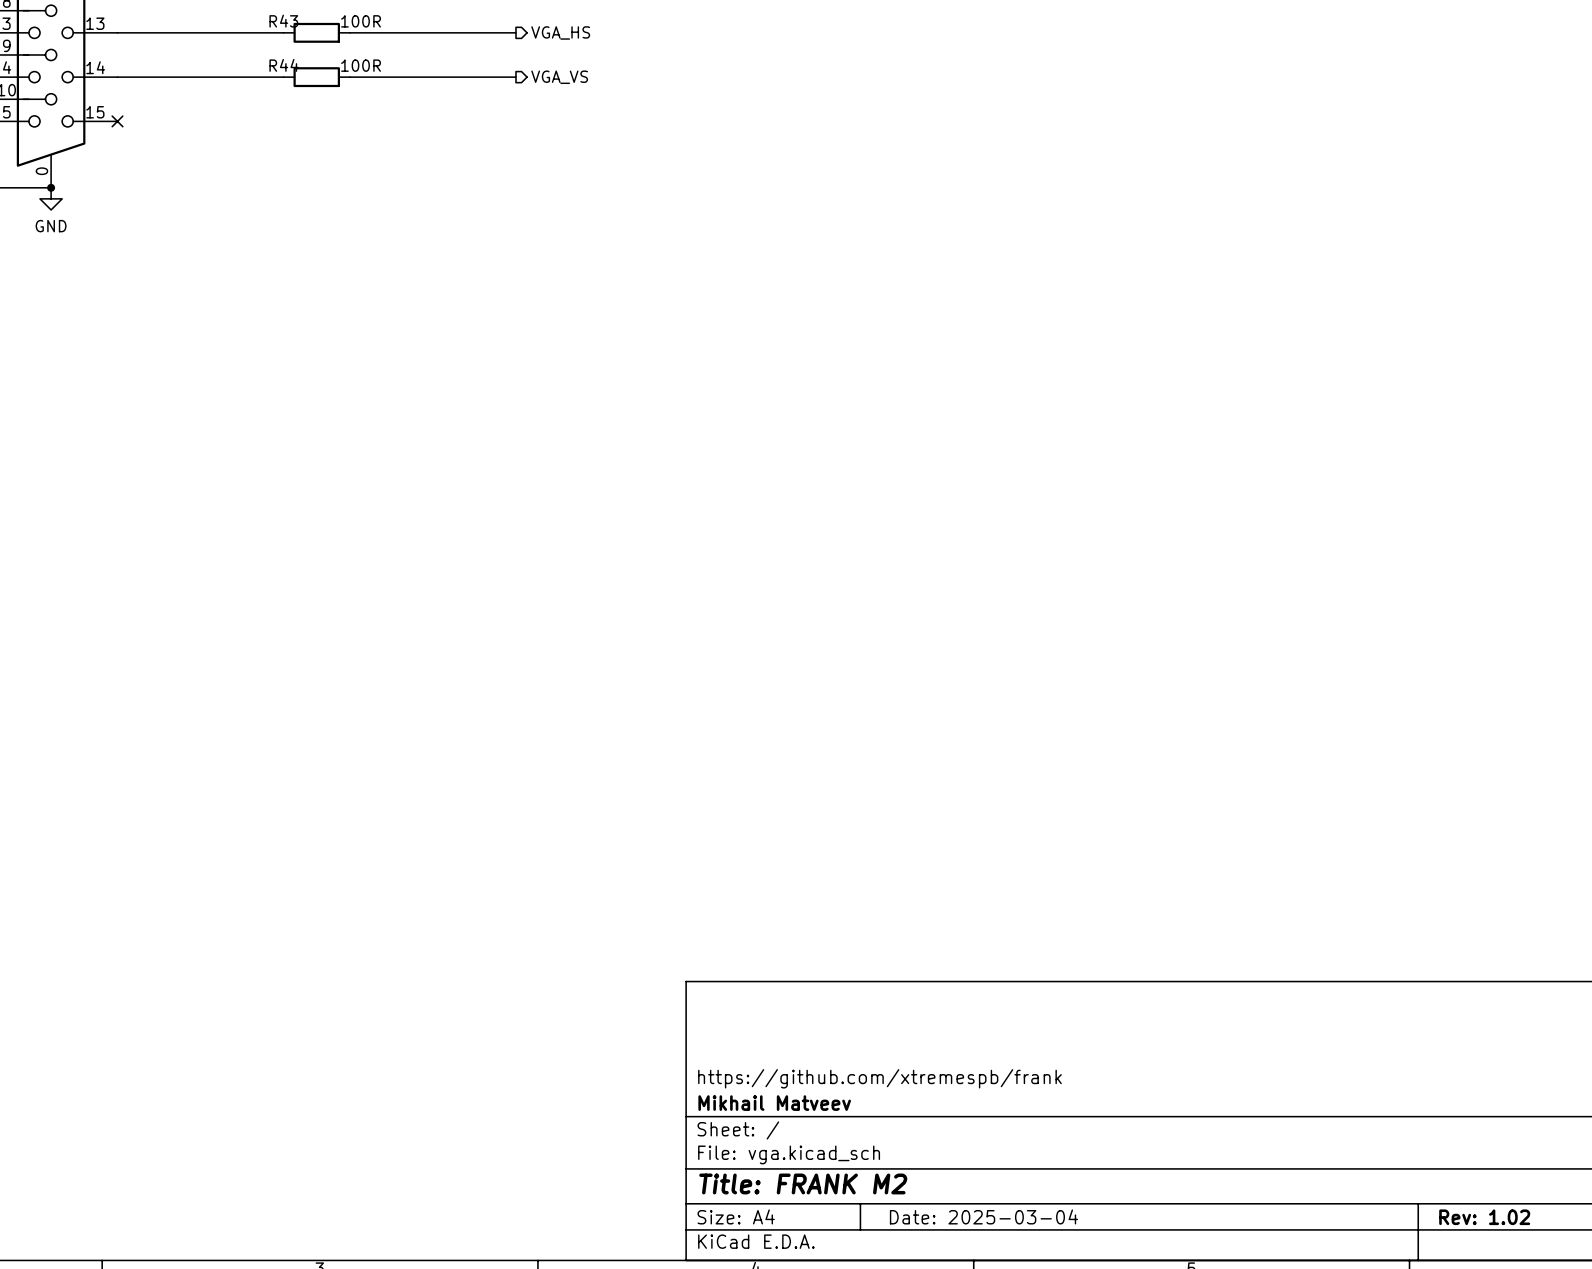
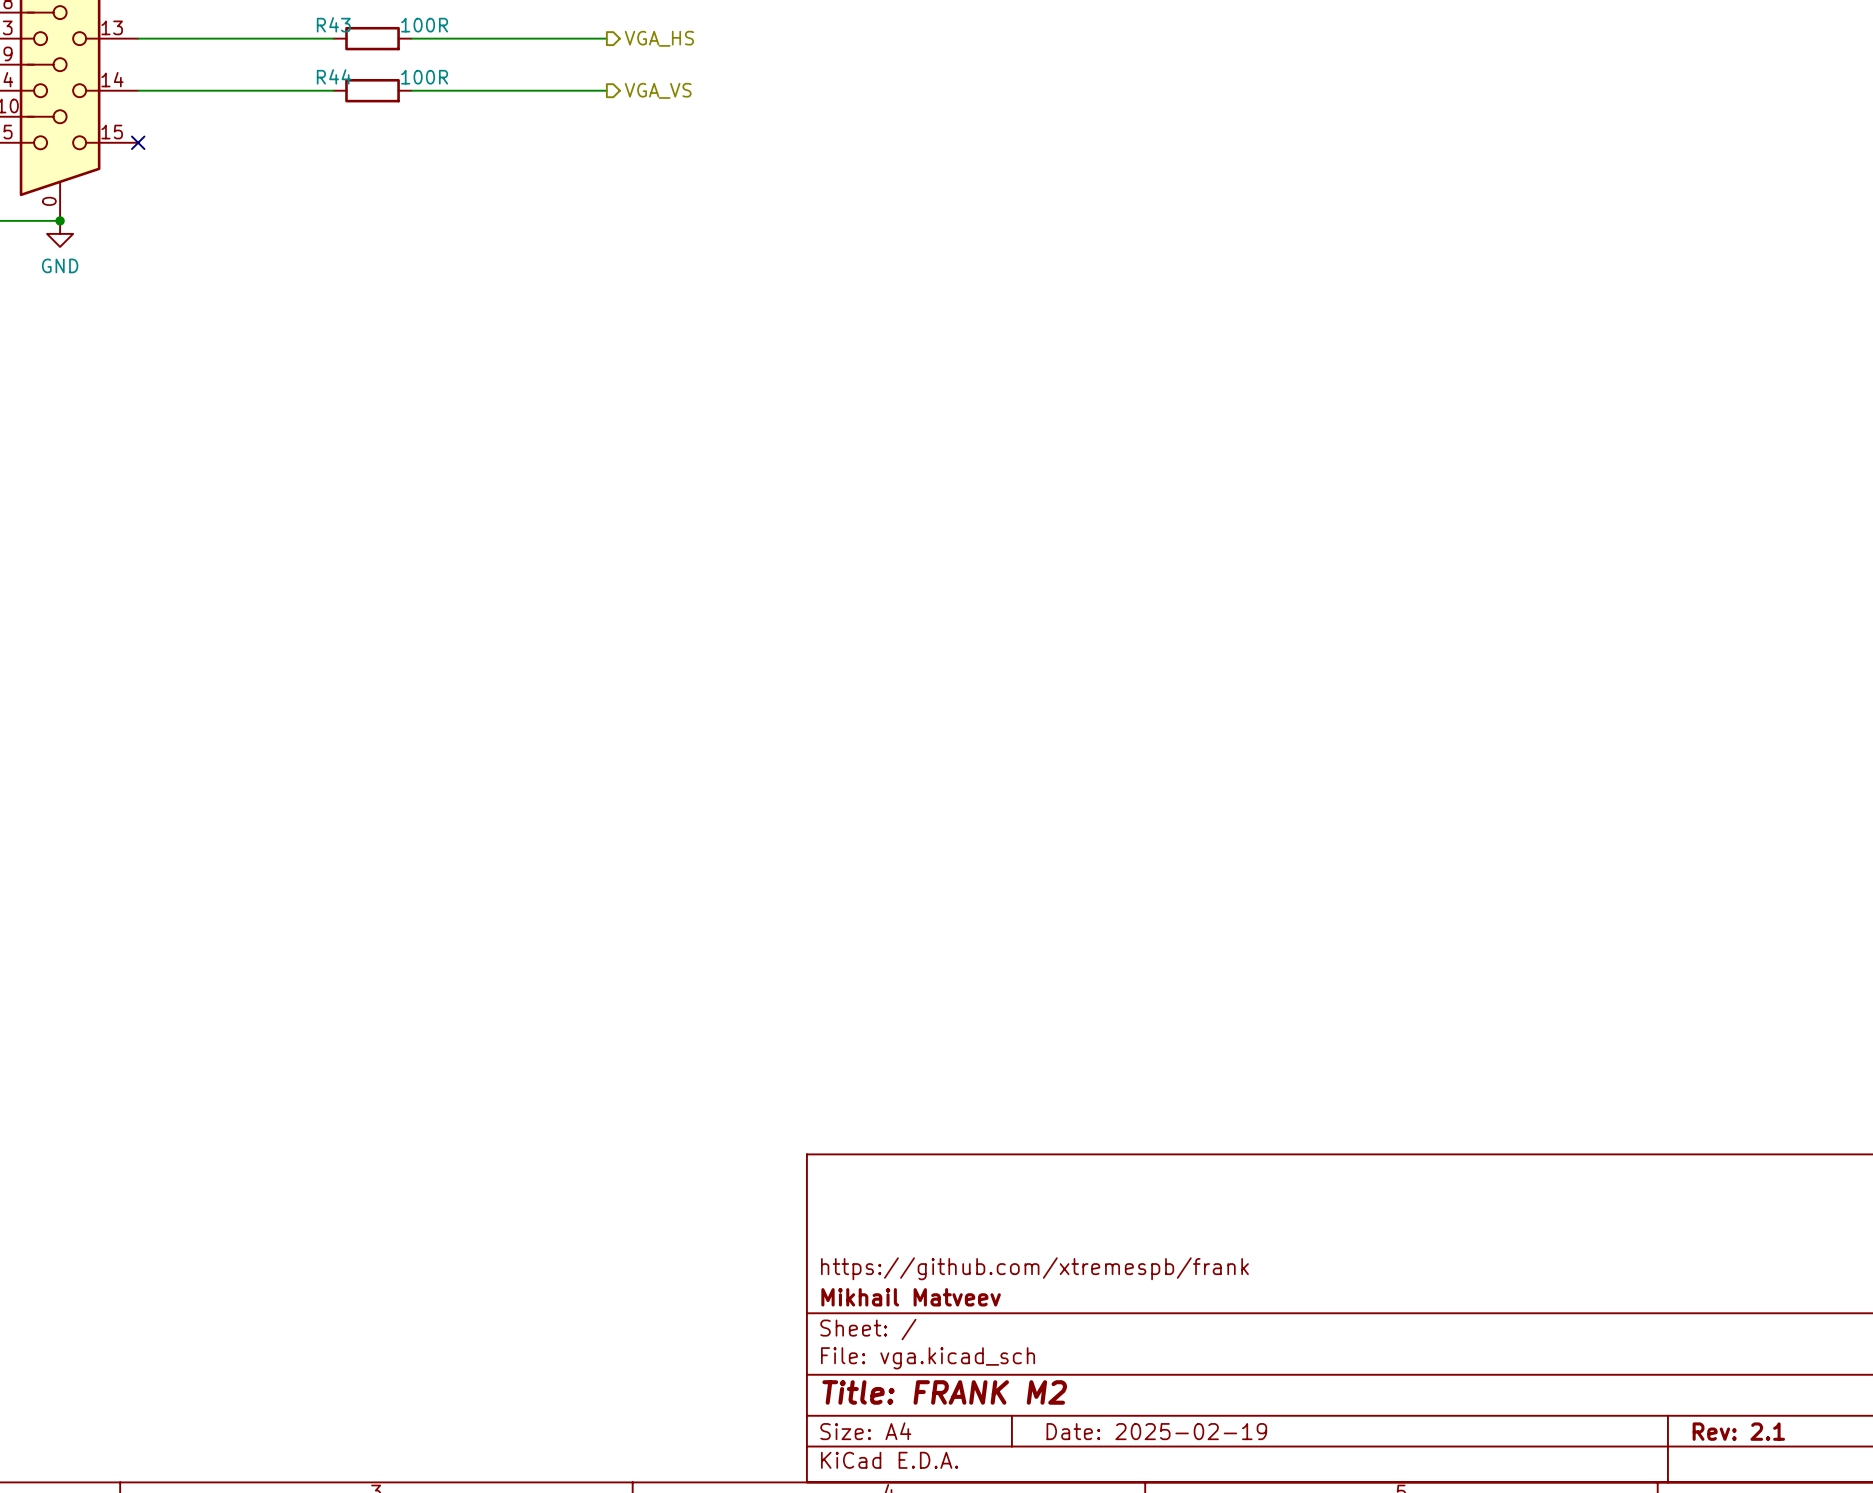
title block: Date: 2025-03-04 (983, 1216) -> Date: 2025-02-19 (1156, 1431)
title block: Rev: 1.02 (1484, 1217) -> Rev: 2.1 (1738, 1431)

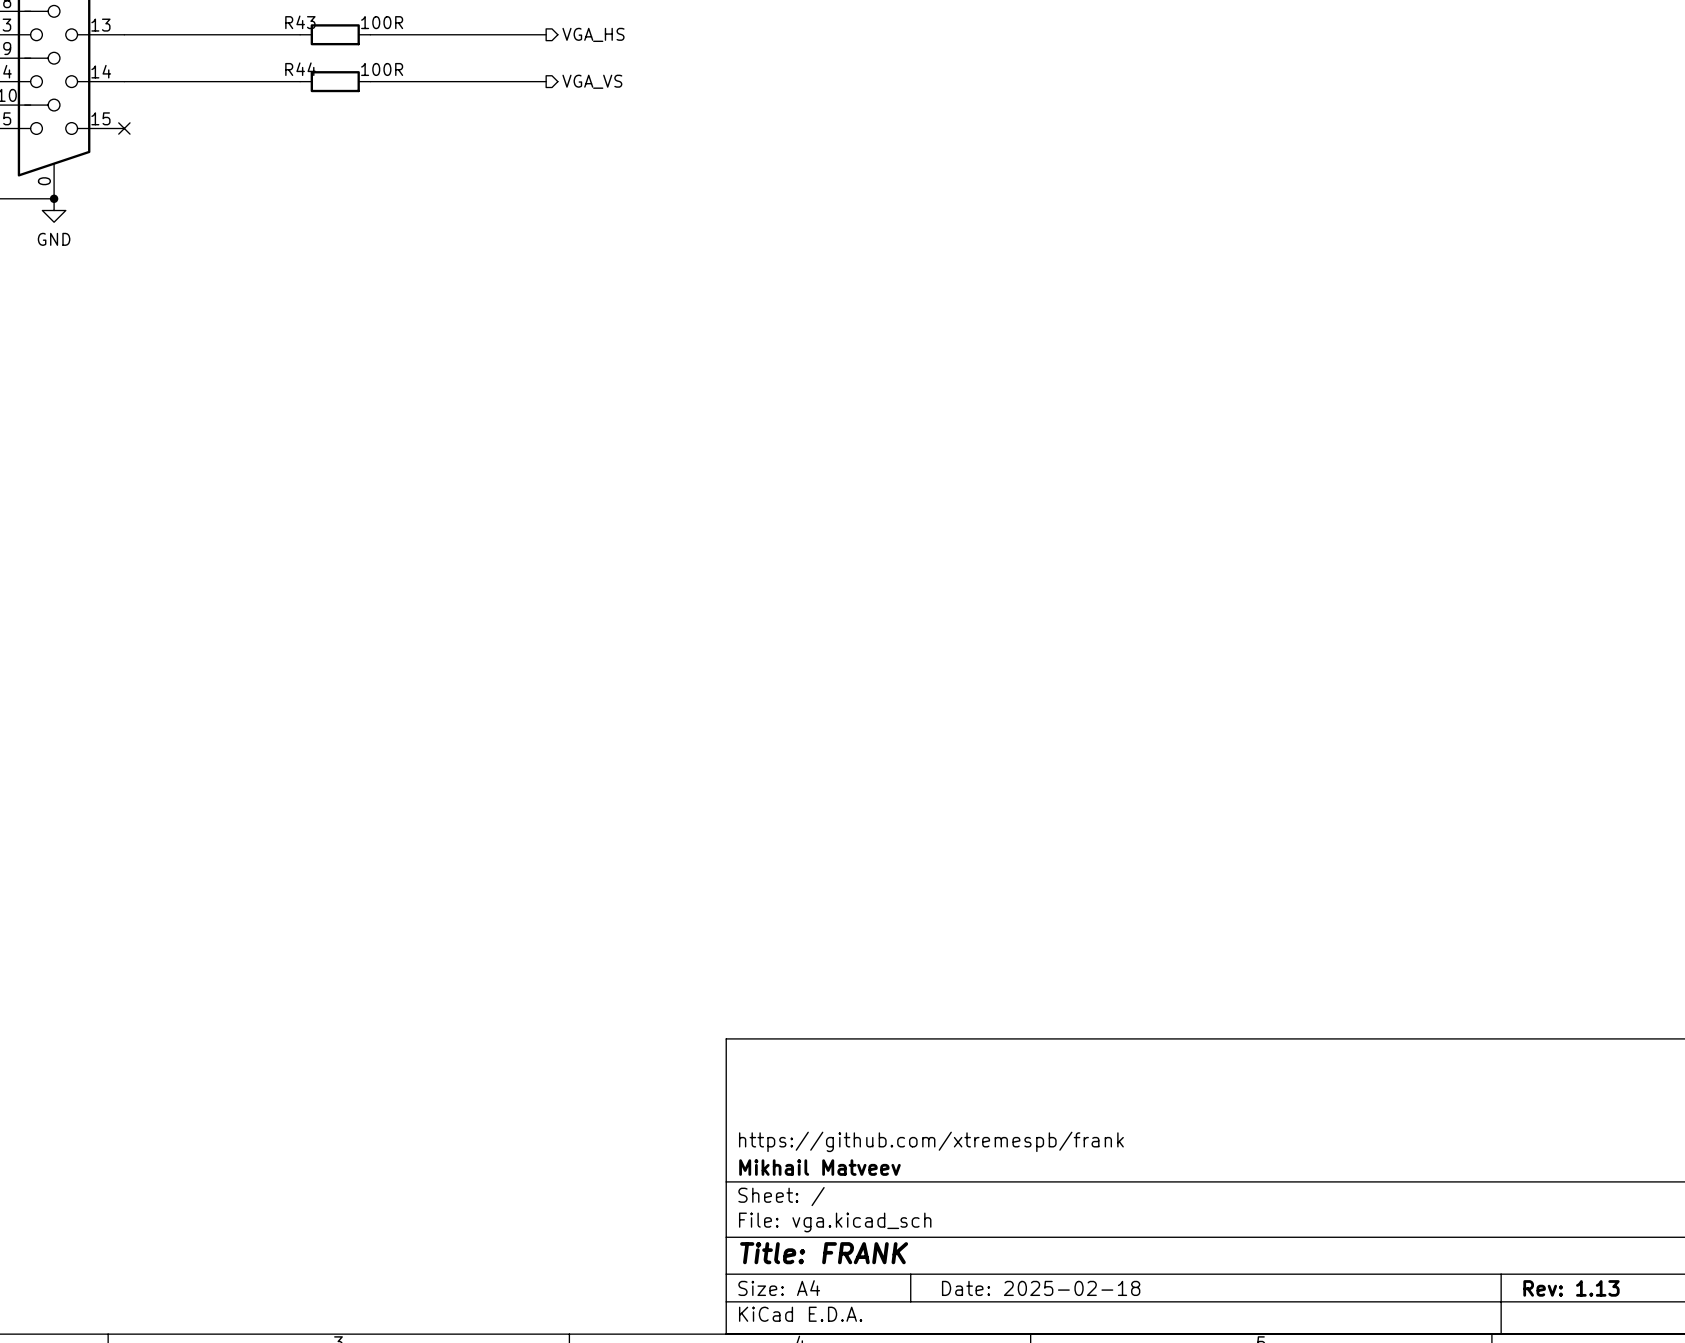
title block: Title: FRANK M2 (944, 1392) -> Title: FRANK (824, 1253)
title block: Date: 2025-02-19 (1156, 1431) -> Date: 2025-02-18 (1041, 1288)
title block: Rev: 2.1 (1738, 1431) -> Rev: 1.13 (1571, 1288)

